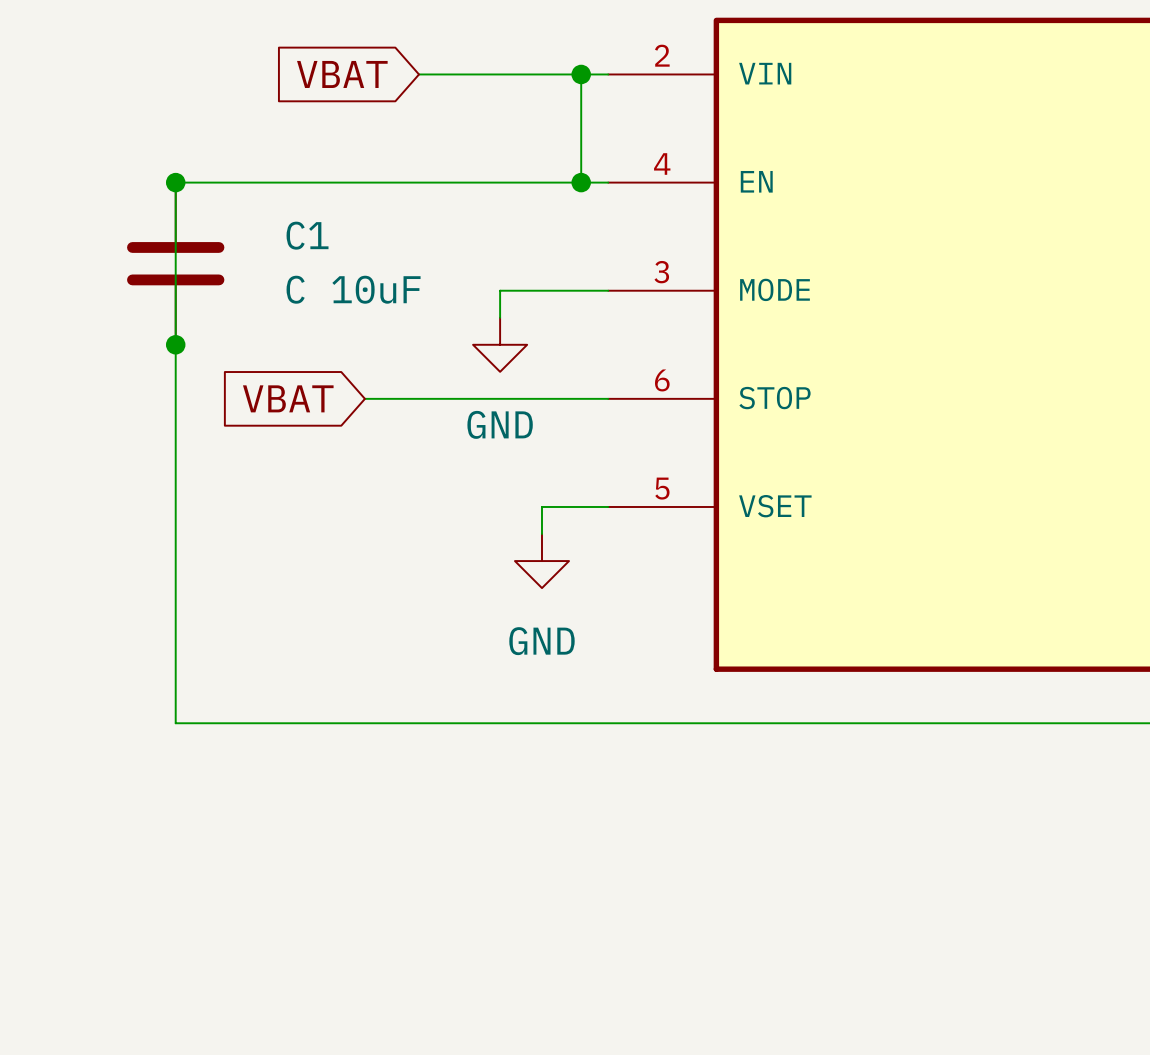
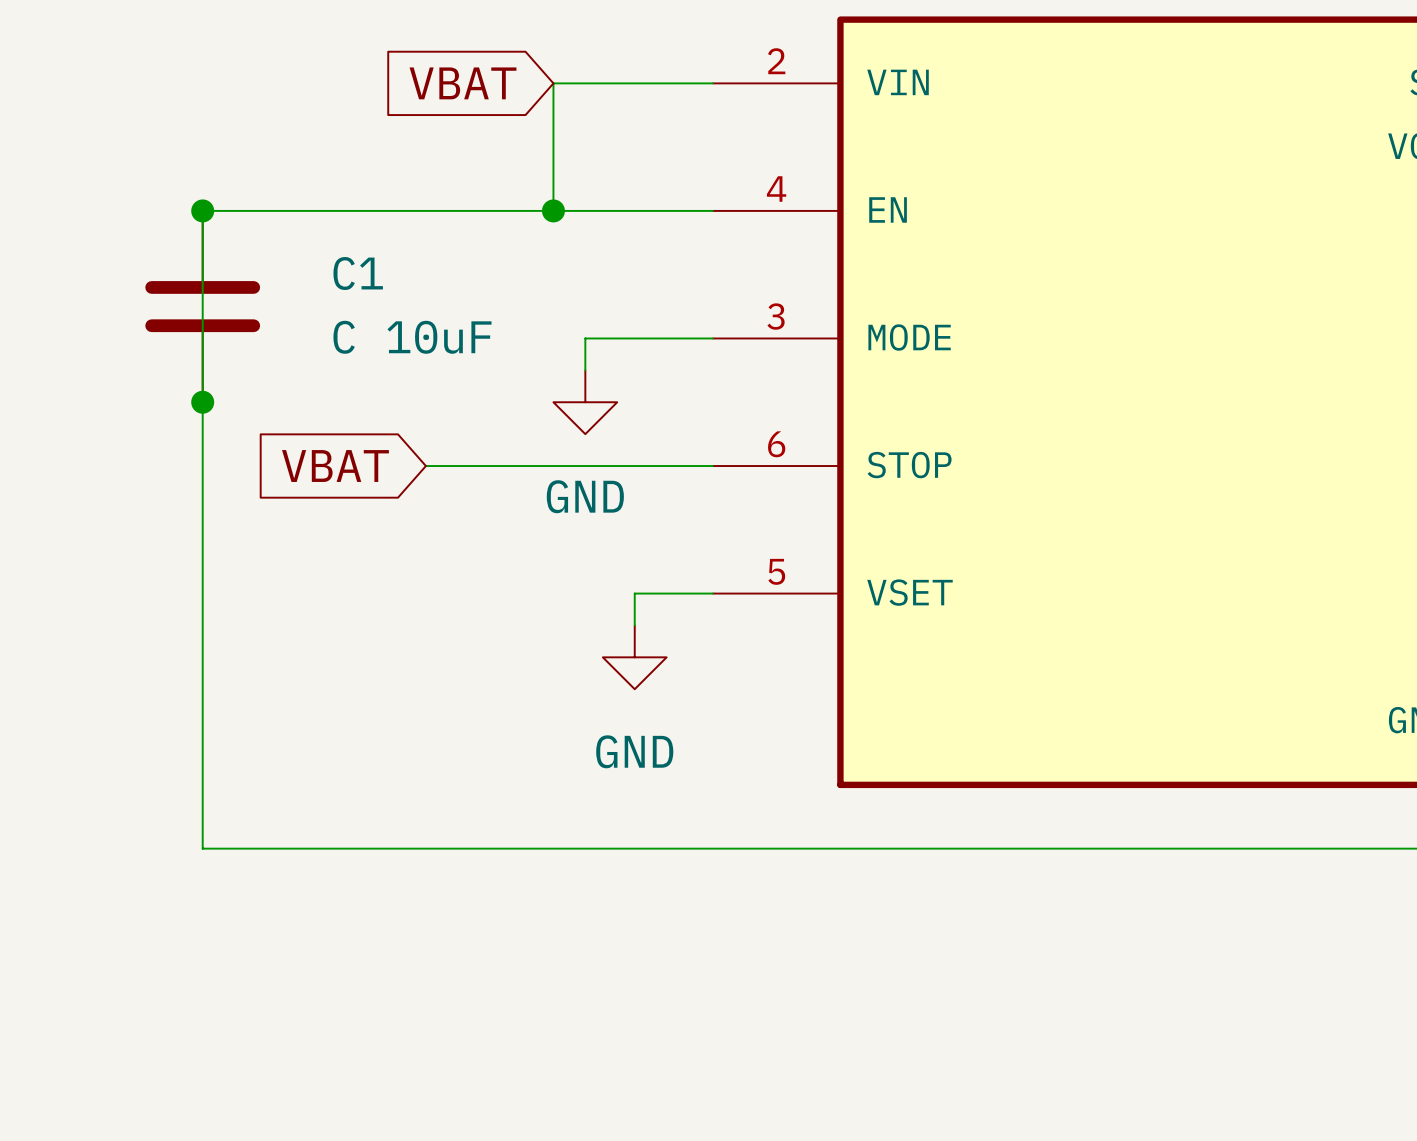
global label position: VBAT (342, 74) -> VBAT (463, 83)
wire: (419, 74) (473, 74) -> (553, 210) (553, 83)
wire: (581, 74) (581, 182) -> none
junction: (581, 74) -> none
junction: none -> (553, 210)
junction: (581, 182) -> none

